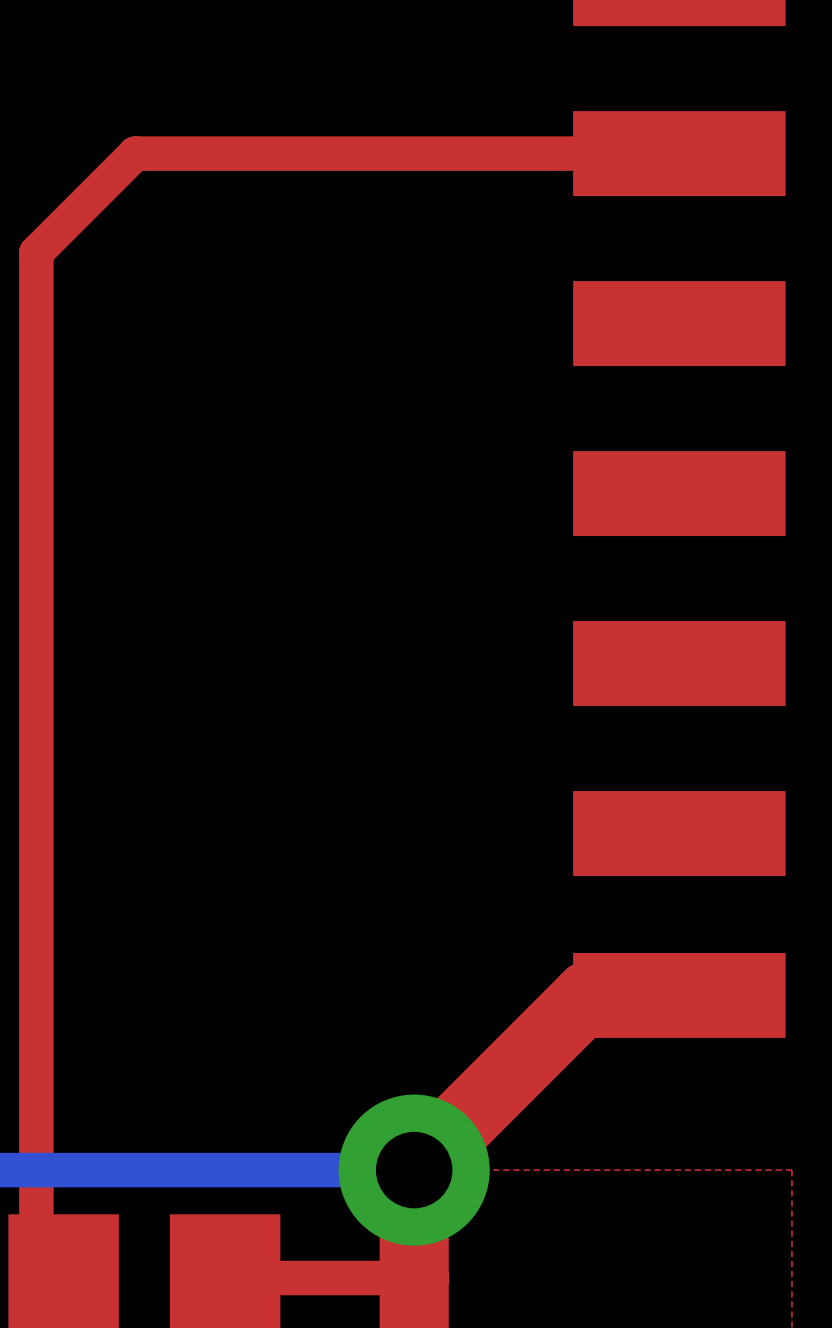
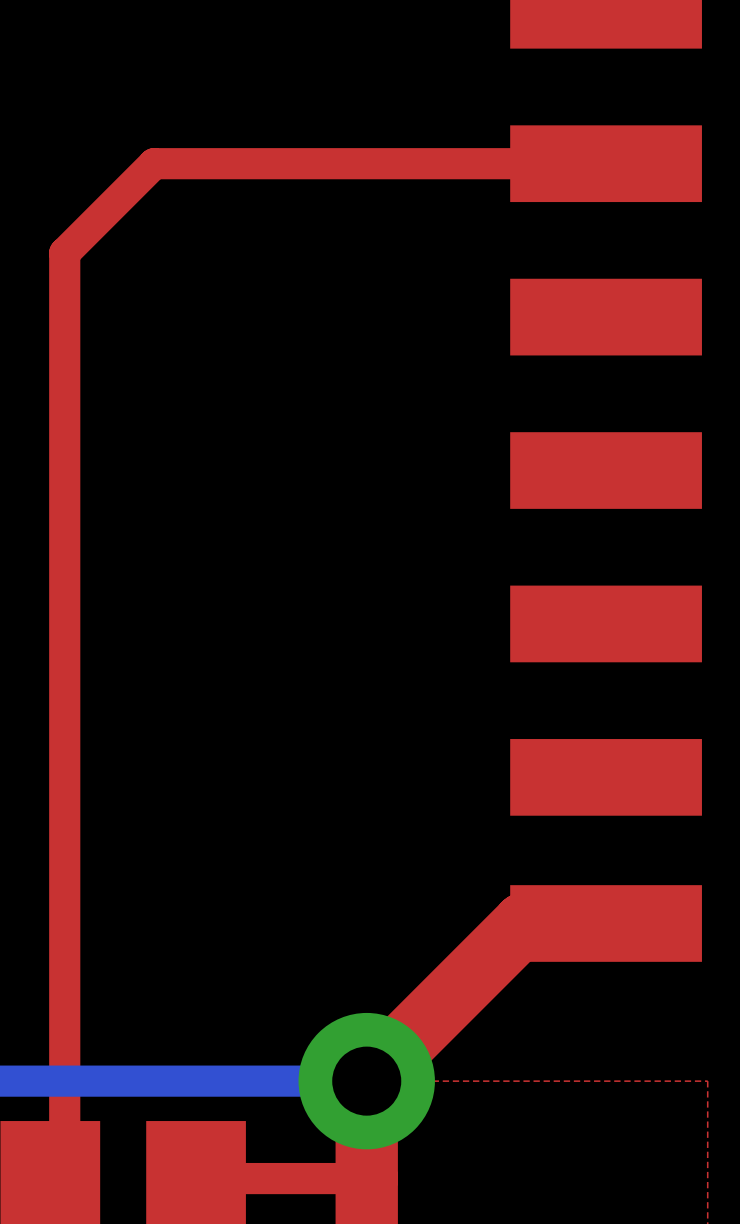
top track: (178, 153) (135, 153) (36, 252) (36, 1251) (63, 1278) -> (154, 163) (64, 253) (64, 1154) (50, 1178)

